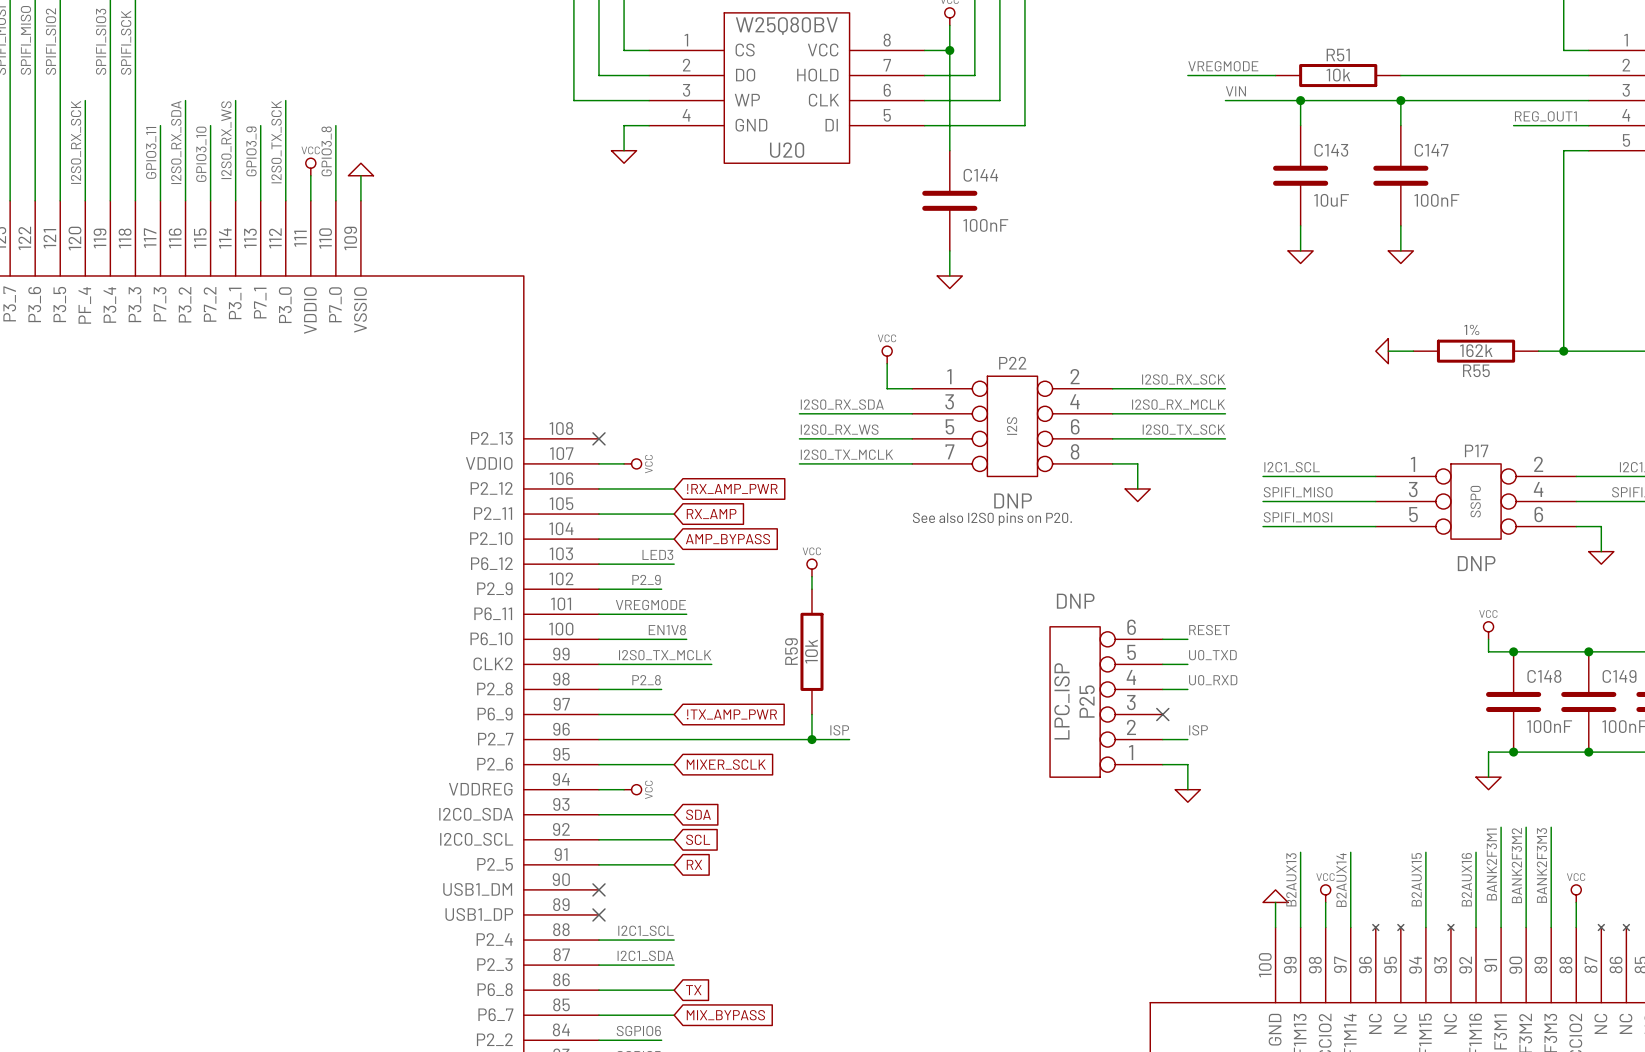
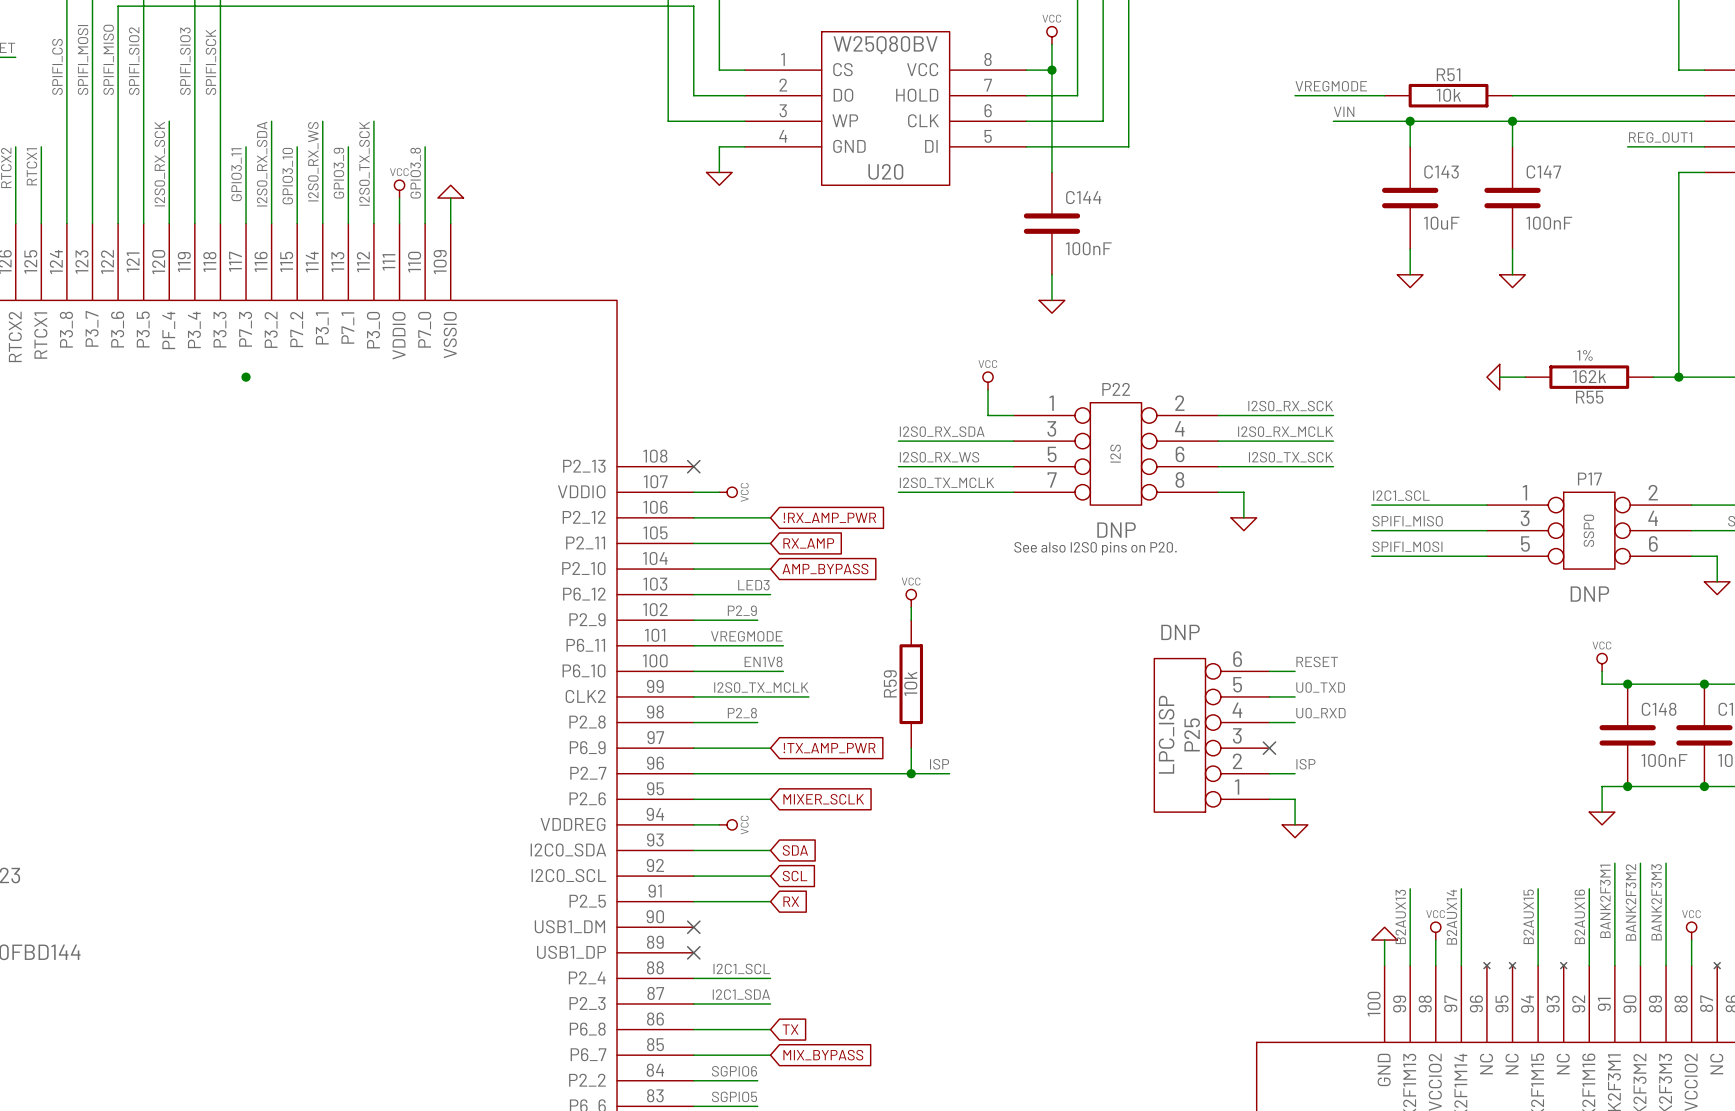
junction: none -> (246, 377)

